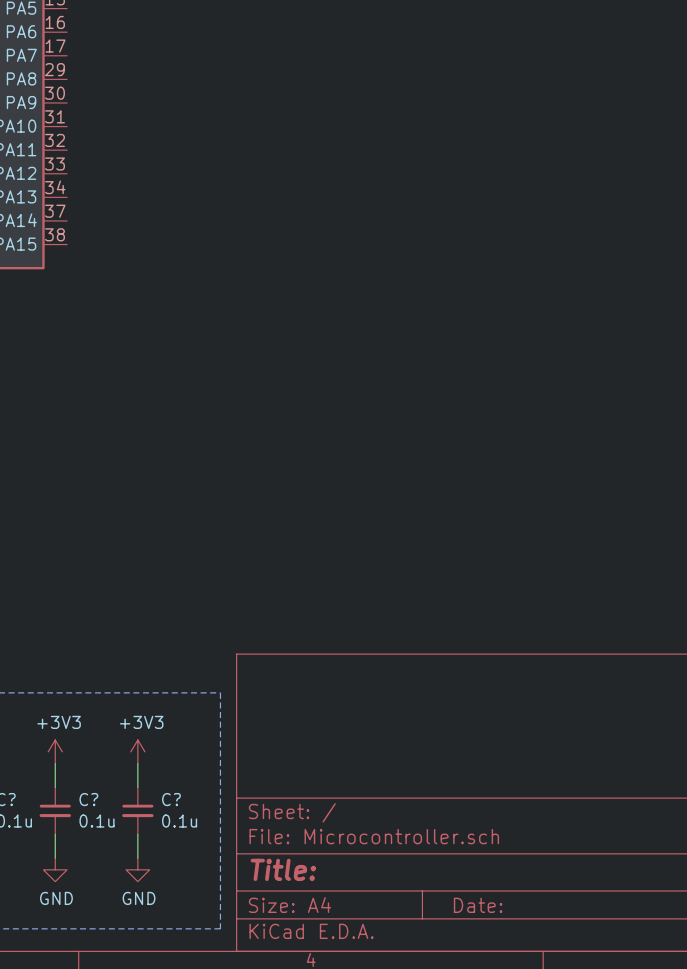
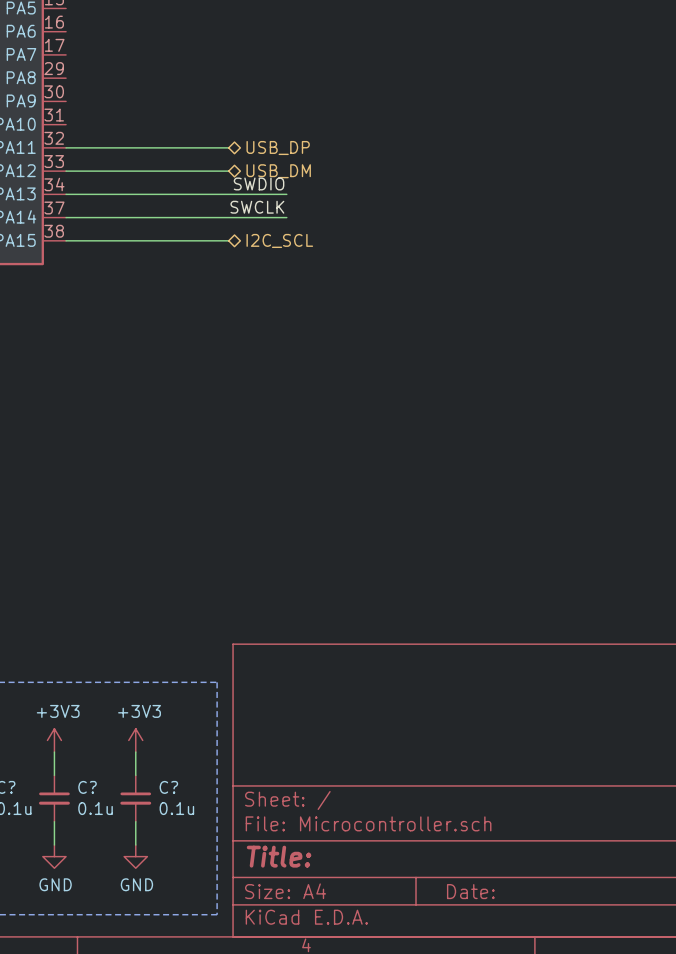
wire: none -> (66, 147) (228, 147)
hierarchical label: none -> USB_DP (278, 148)
wire: none -> (66, 171) (228, 171)
hierarchical label: none -> USB_DM (278, 171)
label: none -> SWDIO (259, 183)
wire: none -> (66, 194) (286, 194)
label: none -> SWCLK (257, 207)
wire: none -> (66, 217) (286, 217)
wire: none -> (66, 240) (228, 240)
hierarchical label: none -> I2C_SCL (279, 240)

